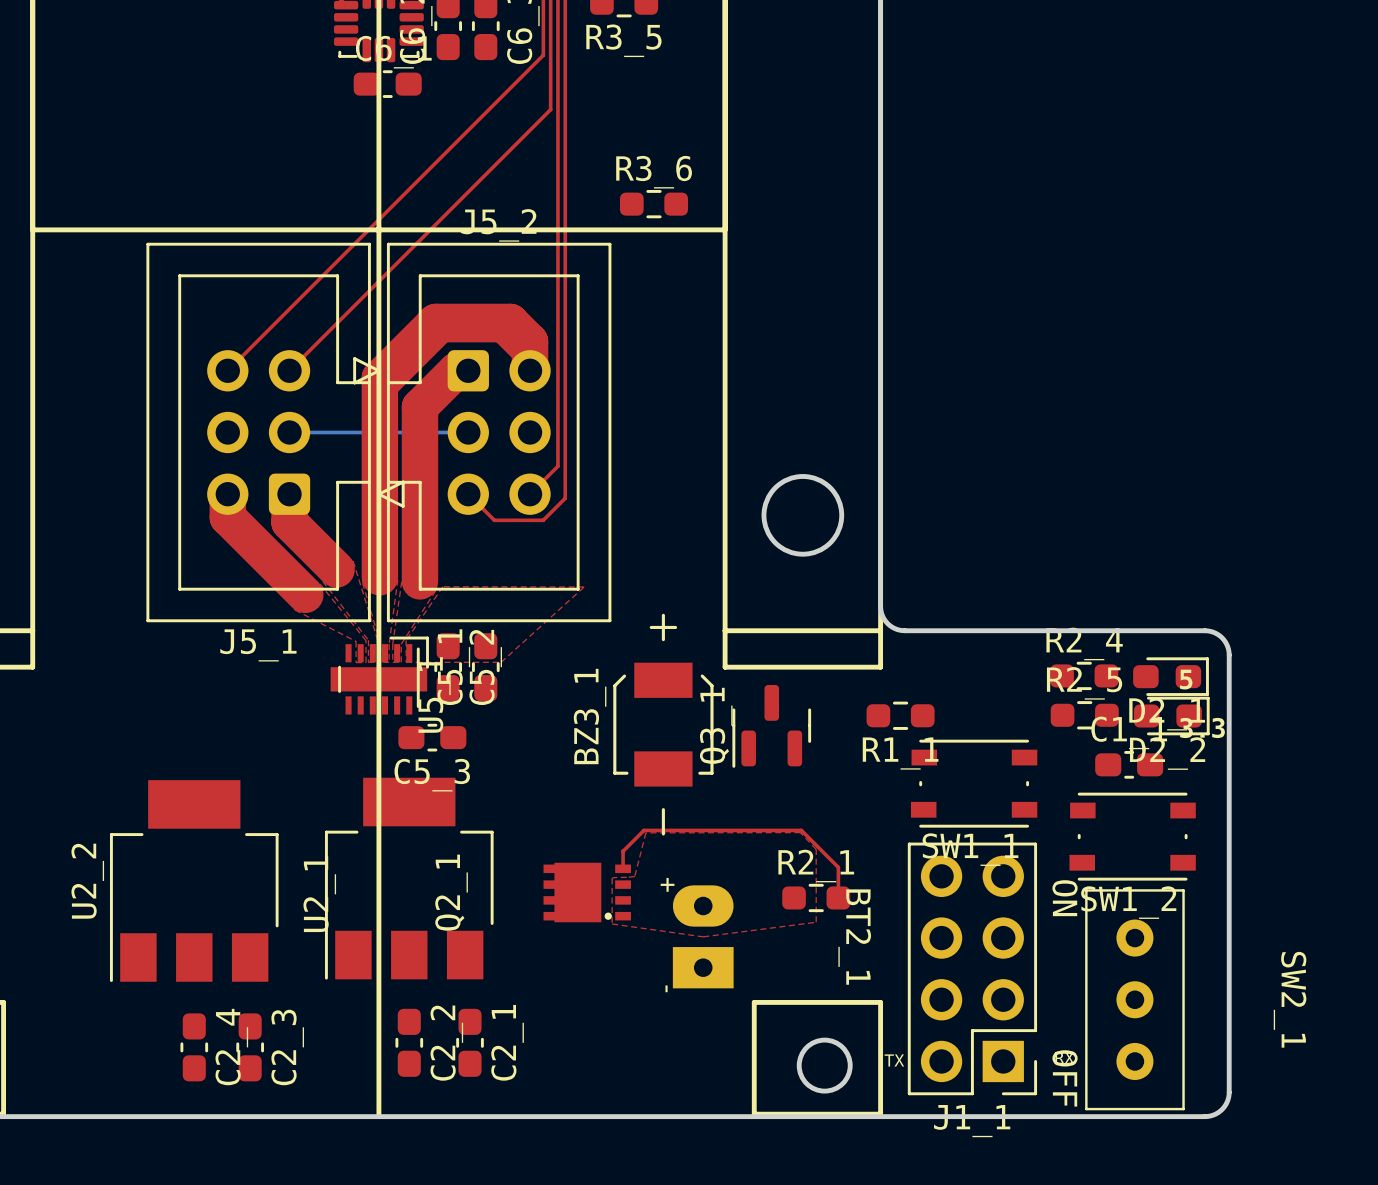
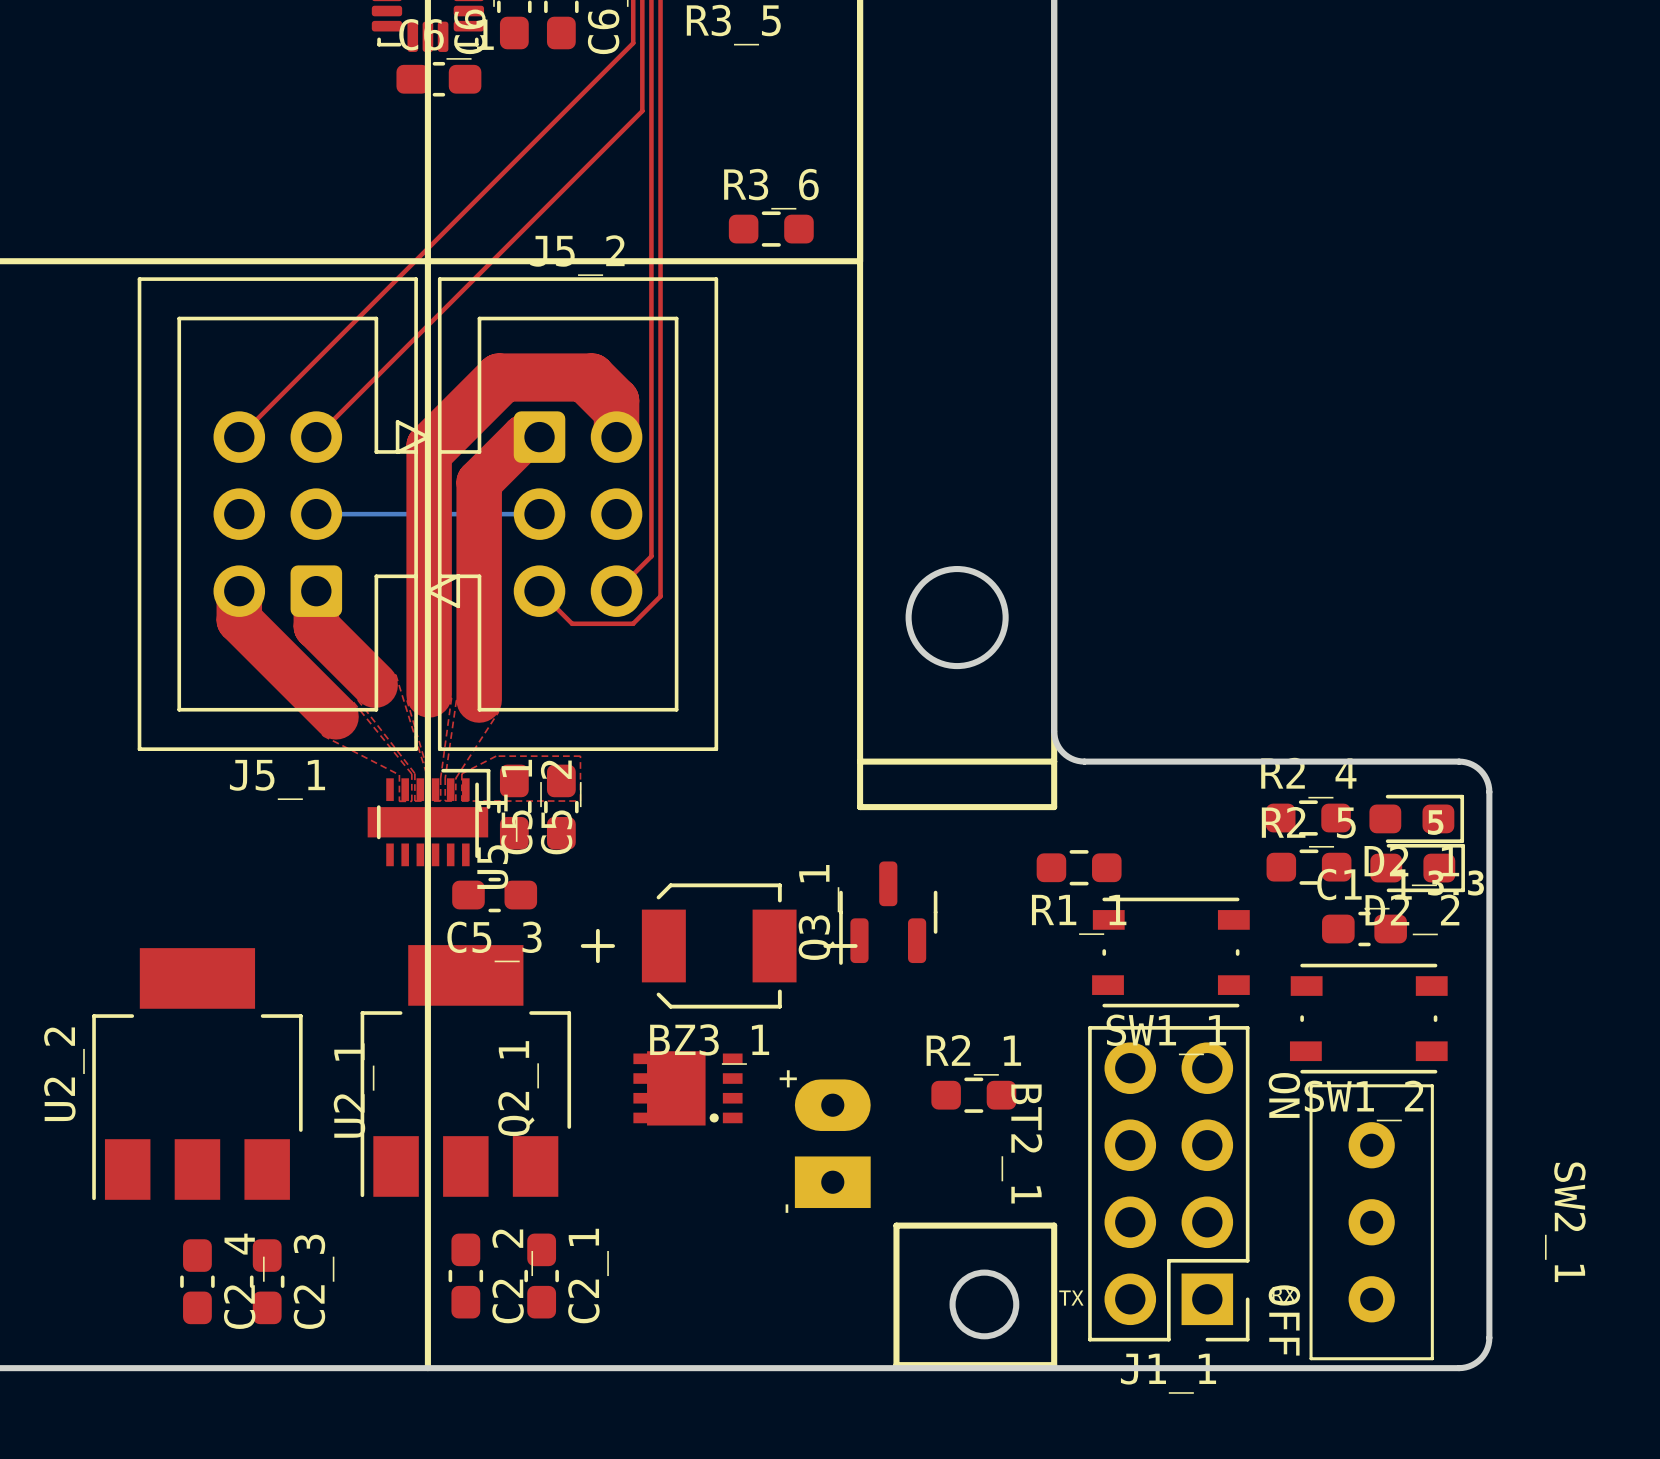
top zone outline: (406, 640) (442, 586) (584, 587) (501, 662) -> (461, 773) (496, 756) (580, 756) (580, 801)
BZ3_1 rotation: 0° (663, 724) -> 90° counterclockwise (719, 945)
Q3_1 position: (771, 726) -> (888, 913)
top zone outline: (800, 832) (816, 849) (816, 922) (703, 936) (612, 923) (612, 878) (634, 876) (645, 832) (800, 832) -> none
top track: (623, 868) (623, 851) (643, 830) (801, 830) (838, 867) (838, 897) -> none

